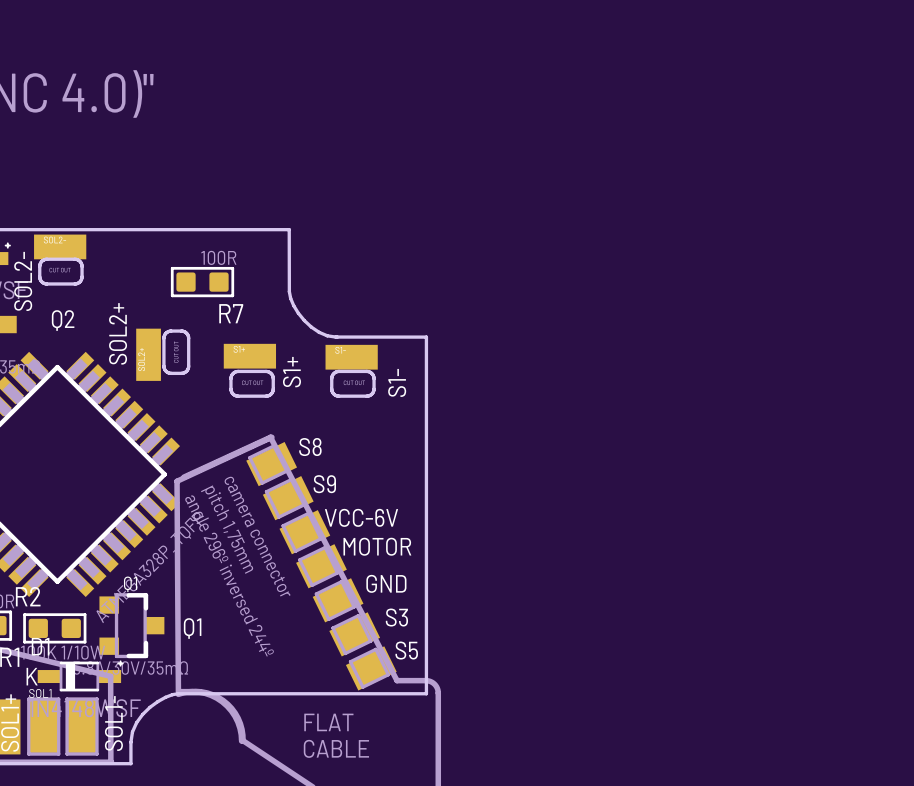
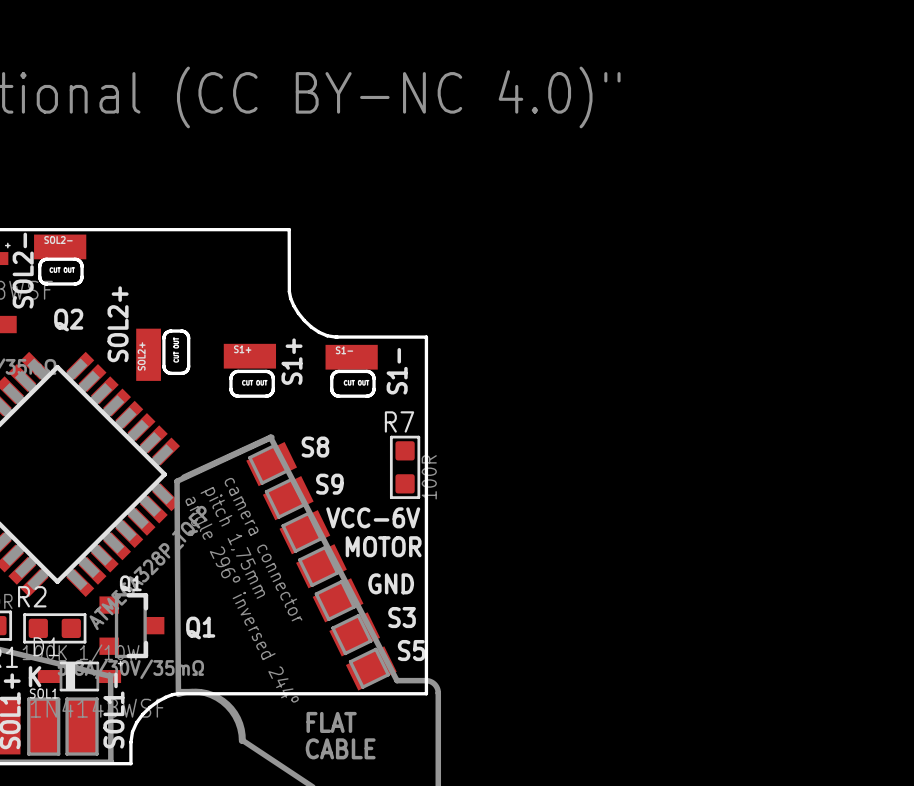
R7 rotation: 0° (202, 282) -> 90° clockwise (405, 467)
R7 position: (202, 282) -> (405, 467)
R7 name position: R7 (231, 313) -> R7 (399, 421)

